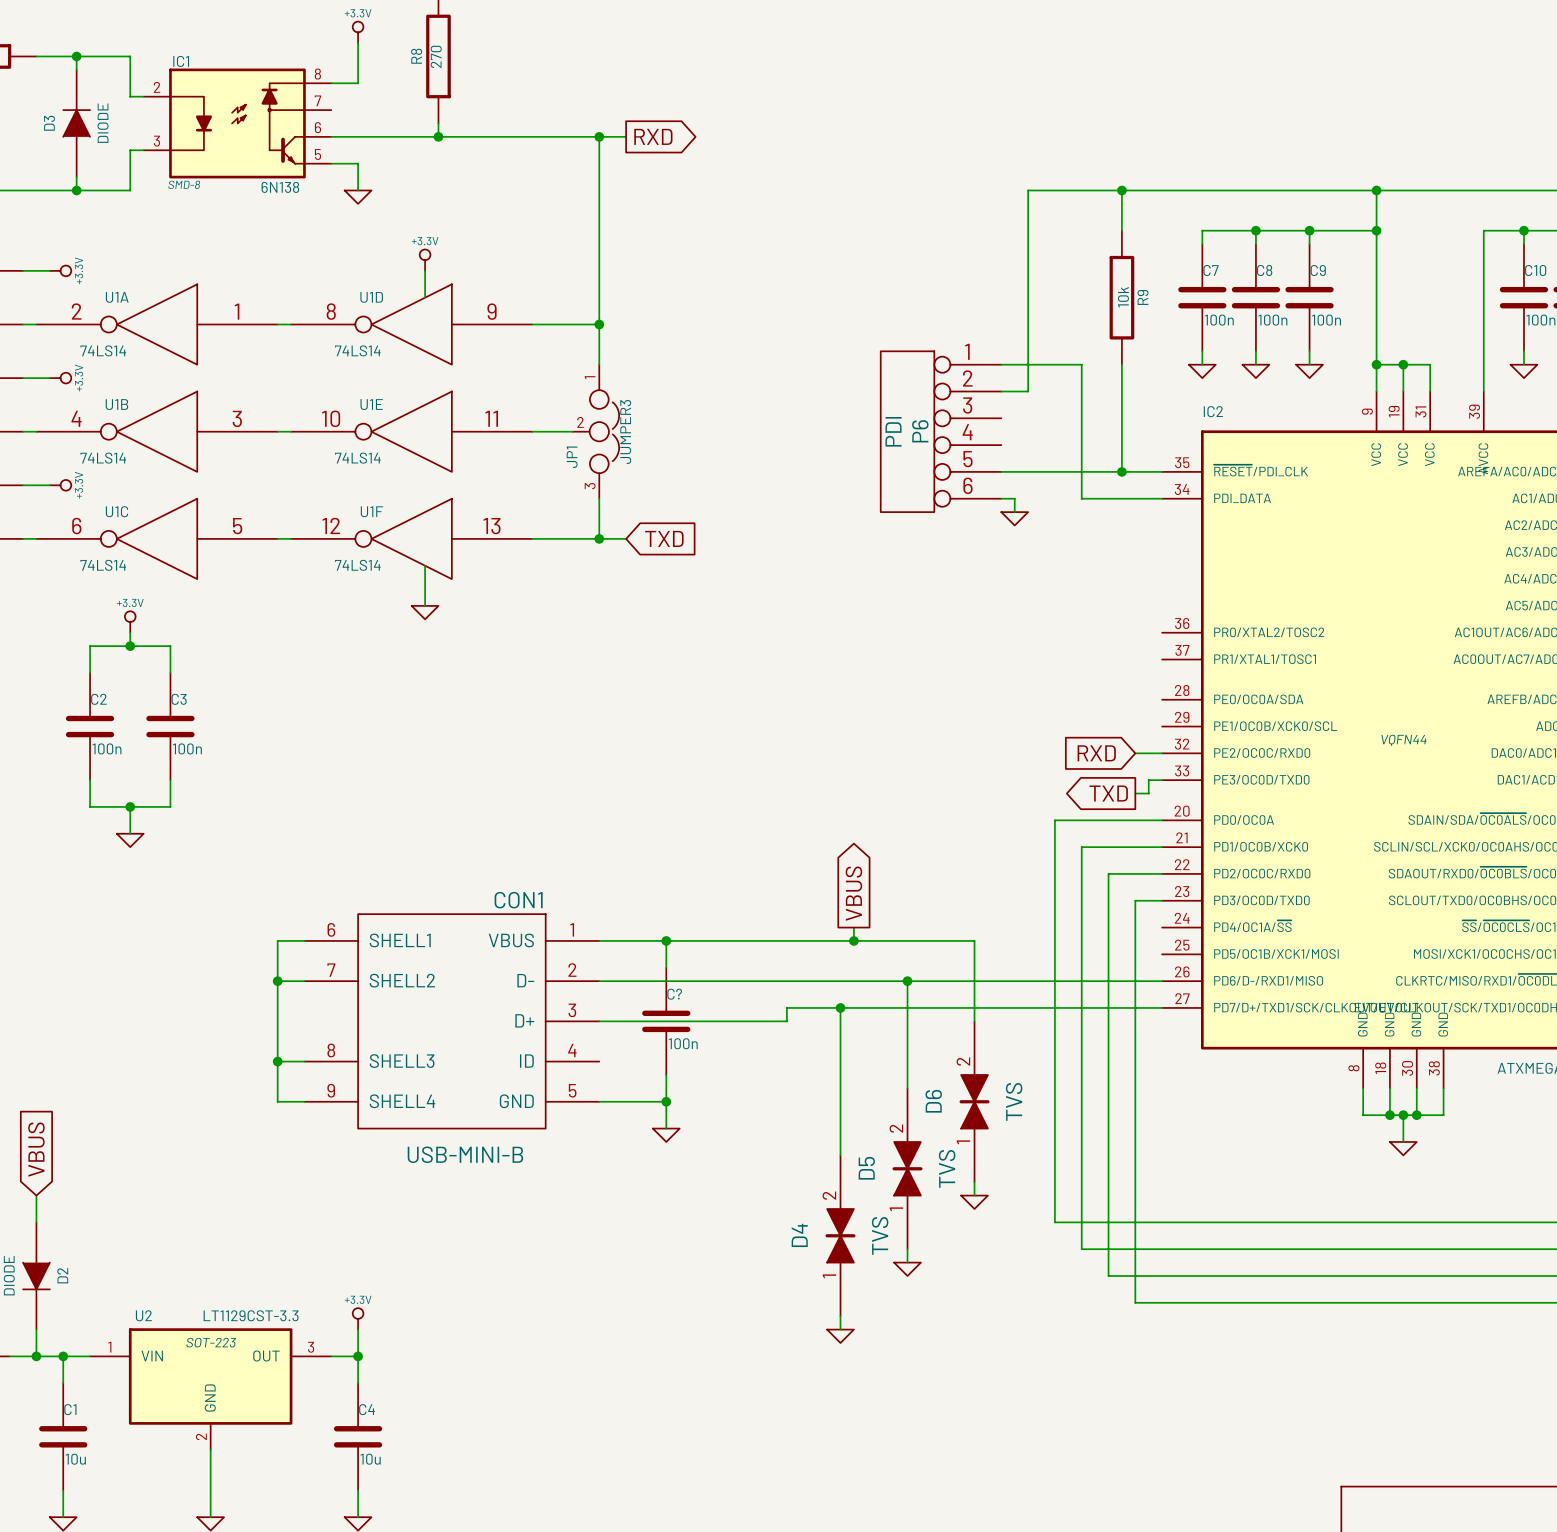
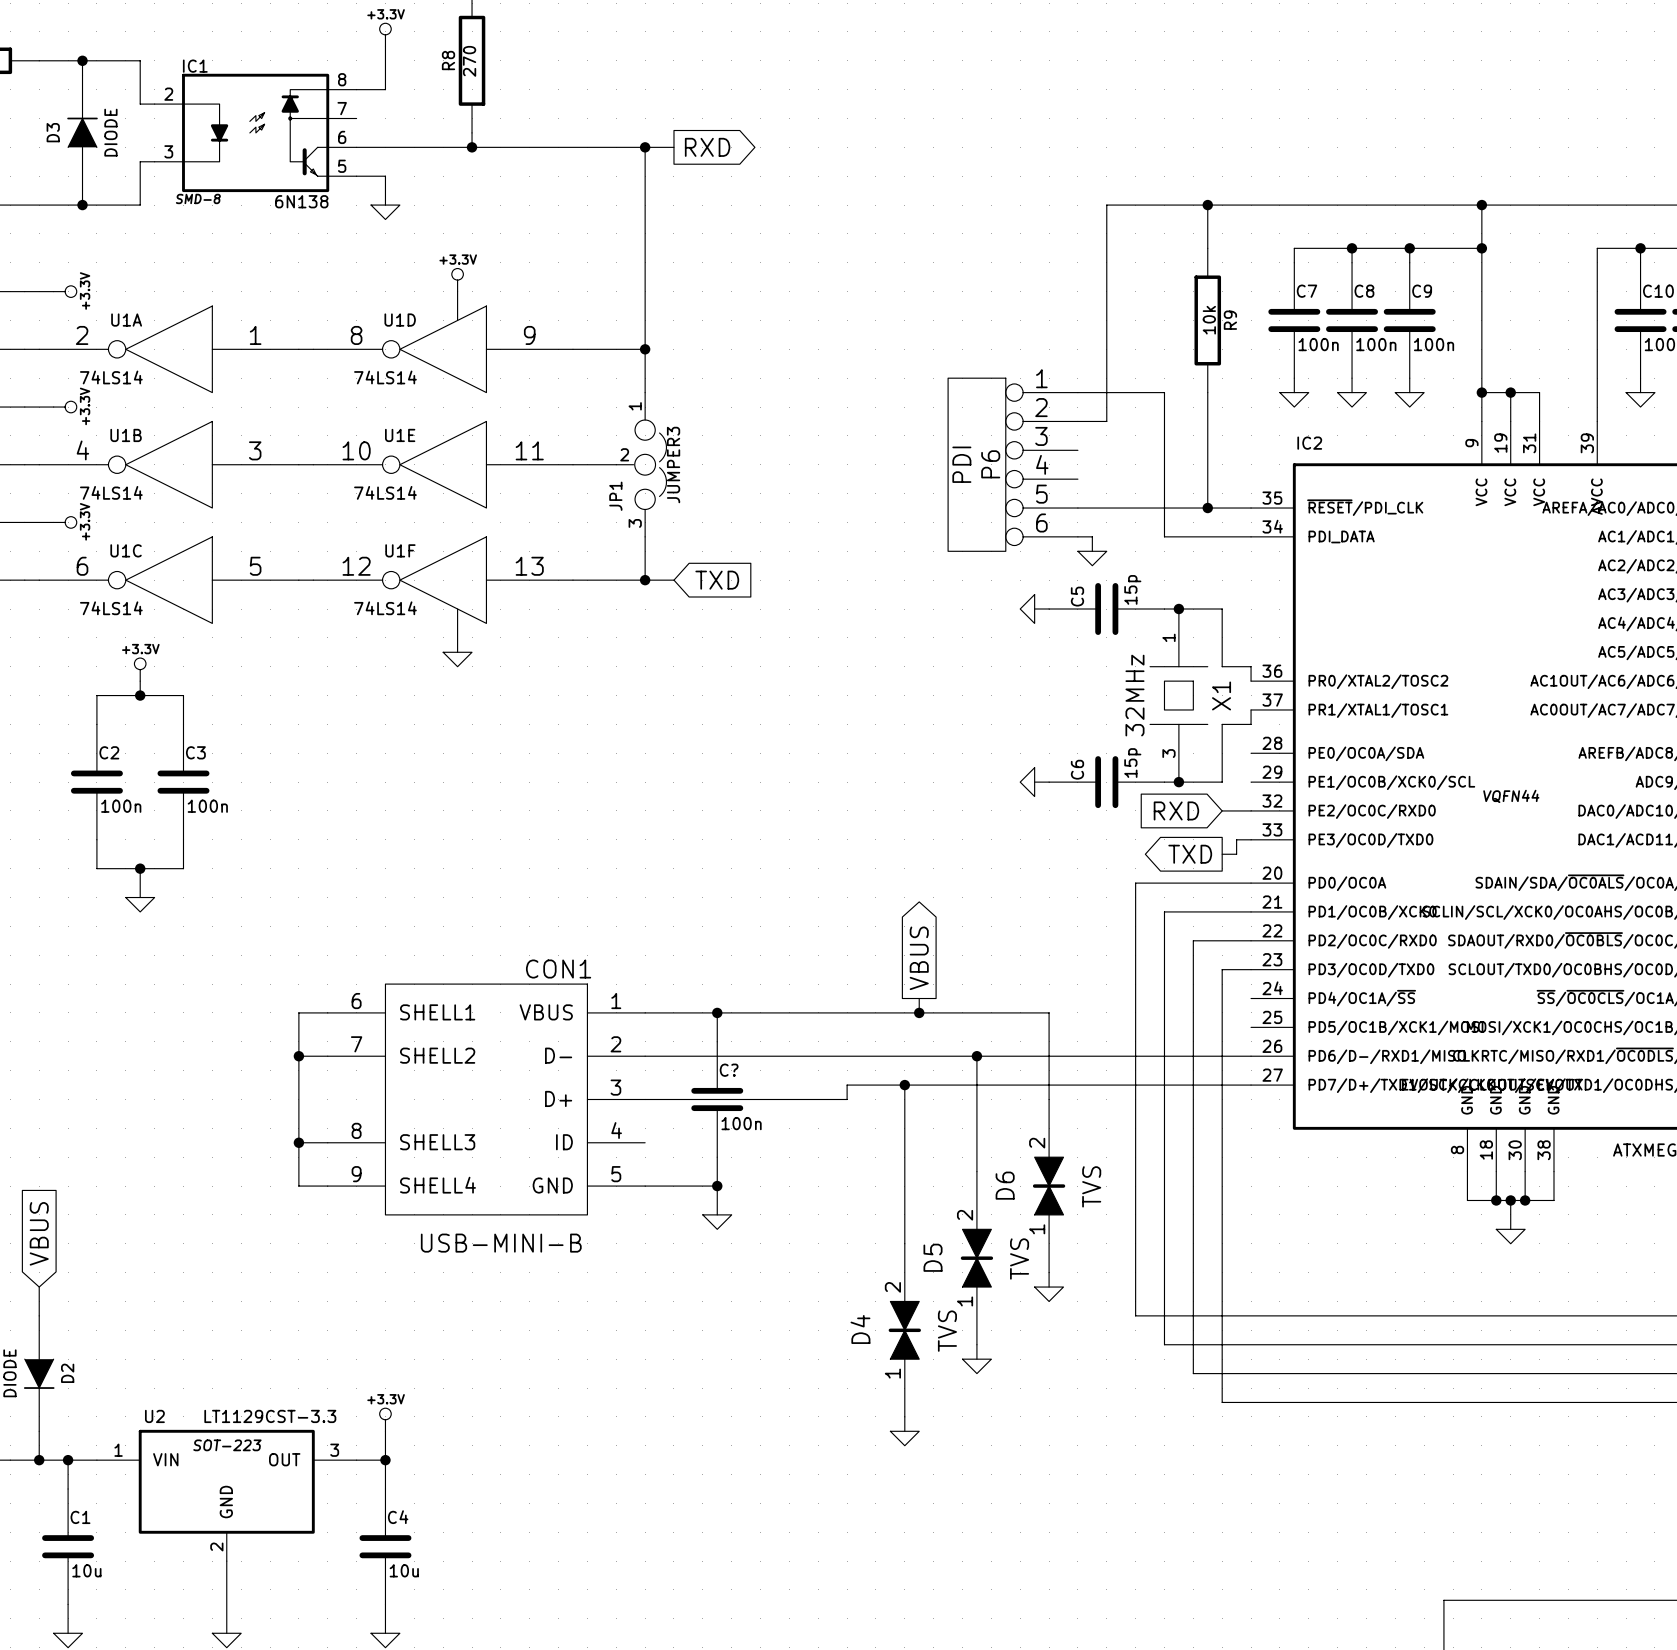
power symbol: none -> (1027, 609)
wire: none -> (1034, 609) (1049, 609)
C5: none -> 15p (1106, 609)
wire: none -> (1164, 609) (1222, 609) (1222, 666) (1251, 666) (1251, 681)
junction: none -> (1178, 609)
X1: none -> 32MHz (1178, 695)
wire: none -> (1251, 709) (1251, 724) (1222, 724) (1222, 782) (1164, 782)
power symbol: none -> (1027, 782)
wire: none -> (1034, 782) (1049, 782)
C6: none -> 15p (1106, 782)
junction: none -> (1178, 782)

